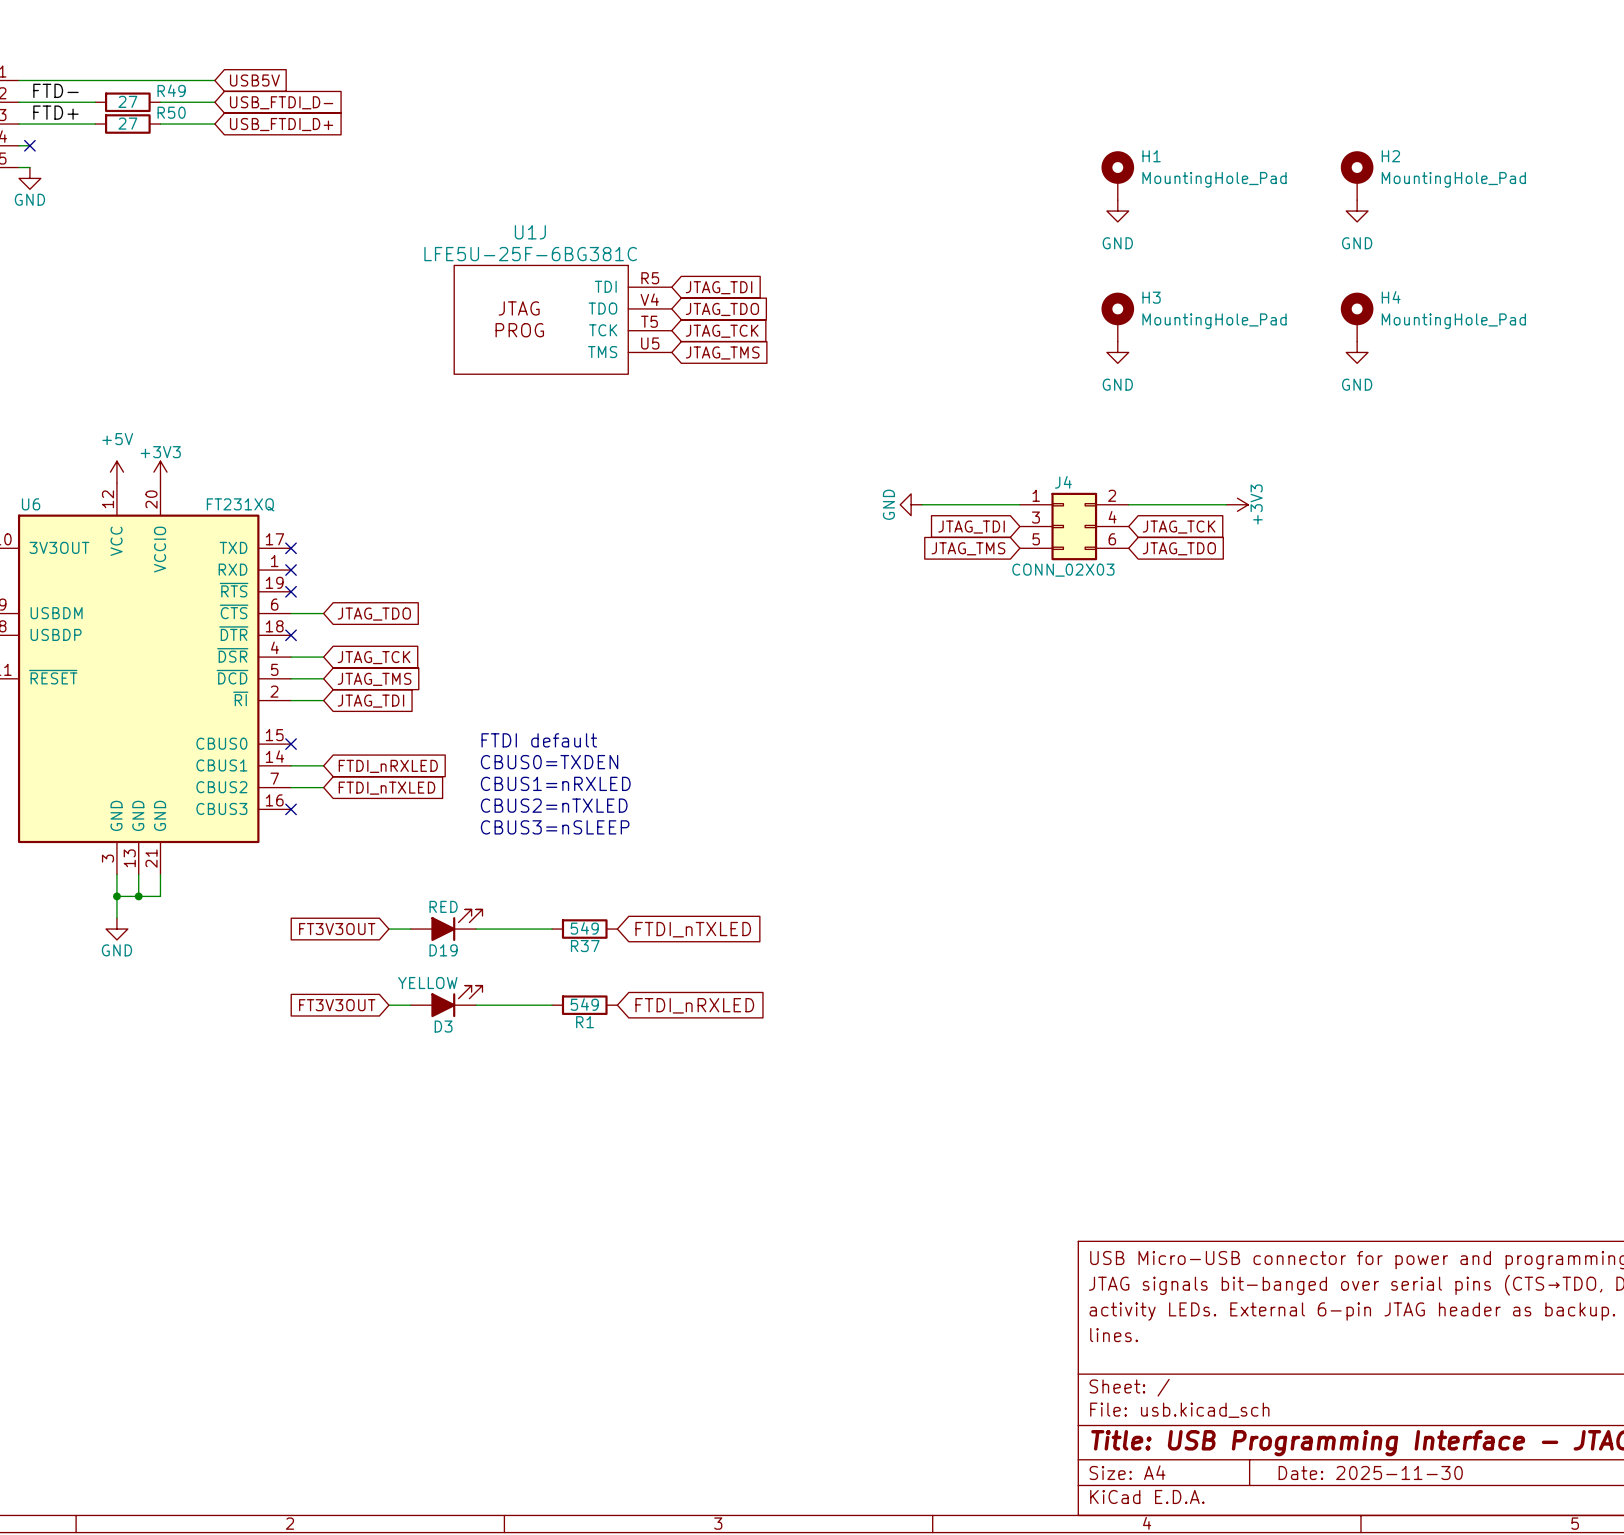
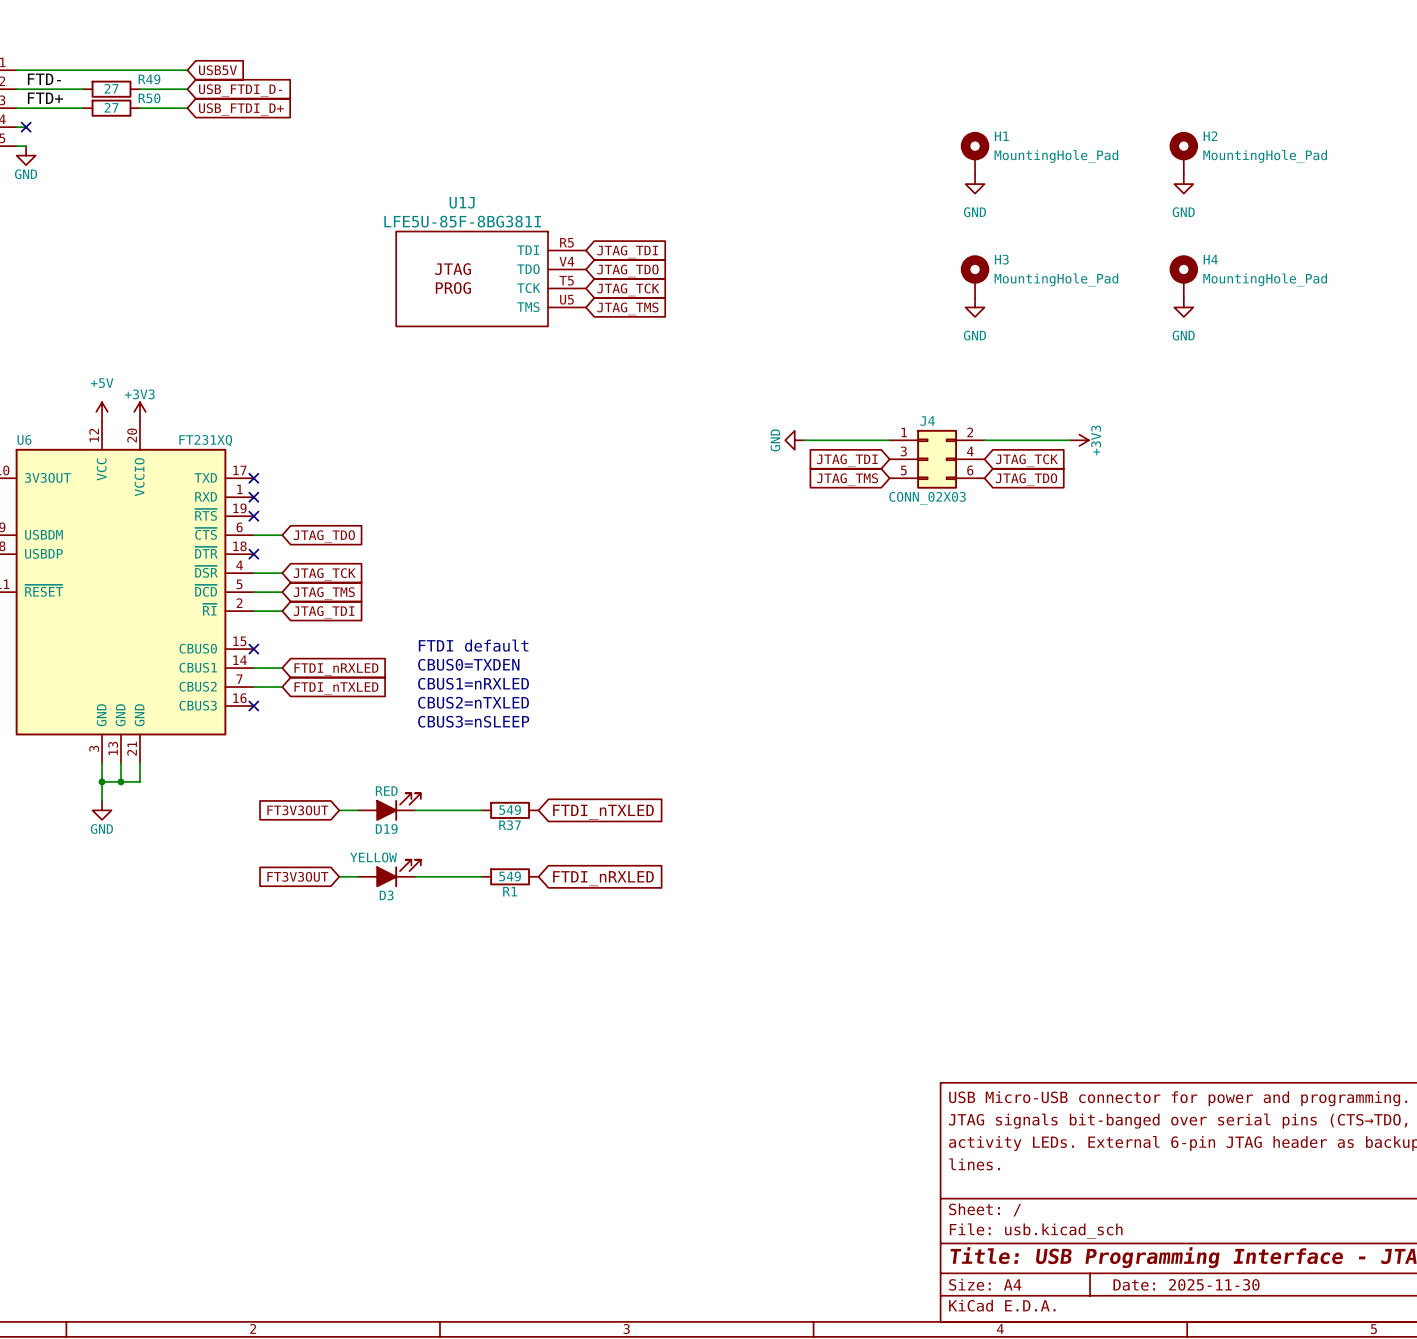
U1J value: LFE5U-25F-6BG381C (530, 254) -> LFE5U-85F-8BG381I (462, 221)

